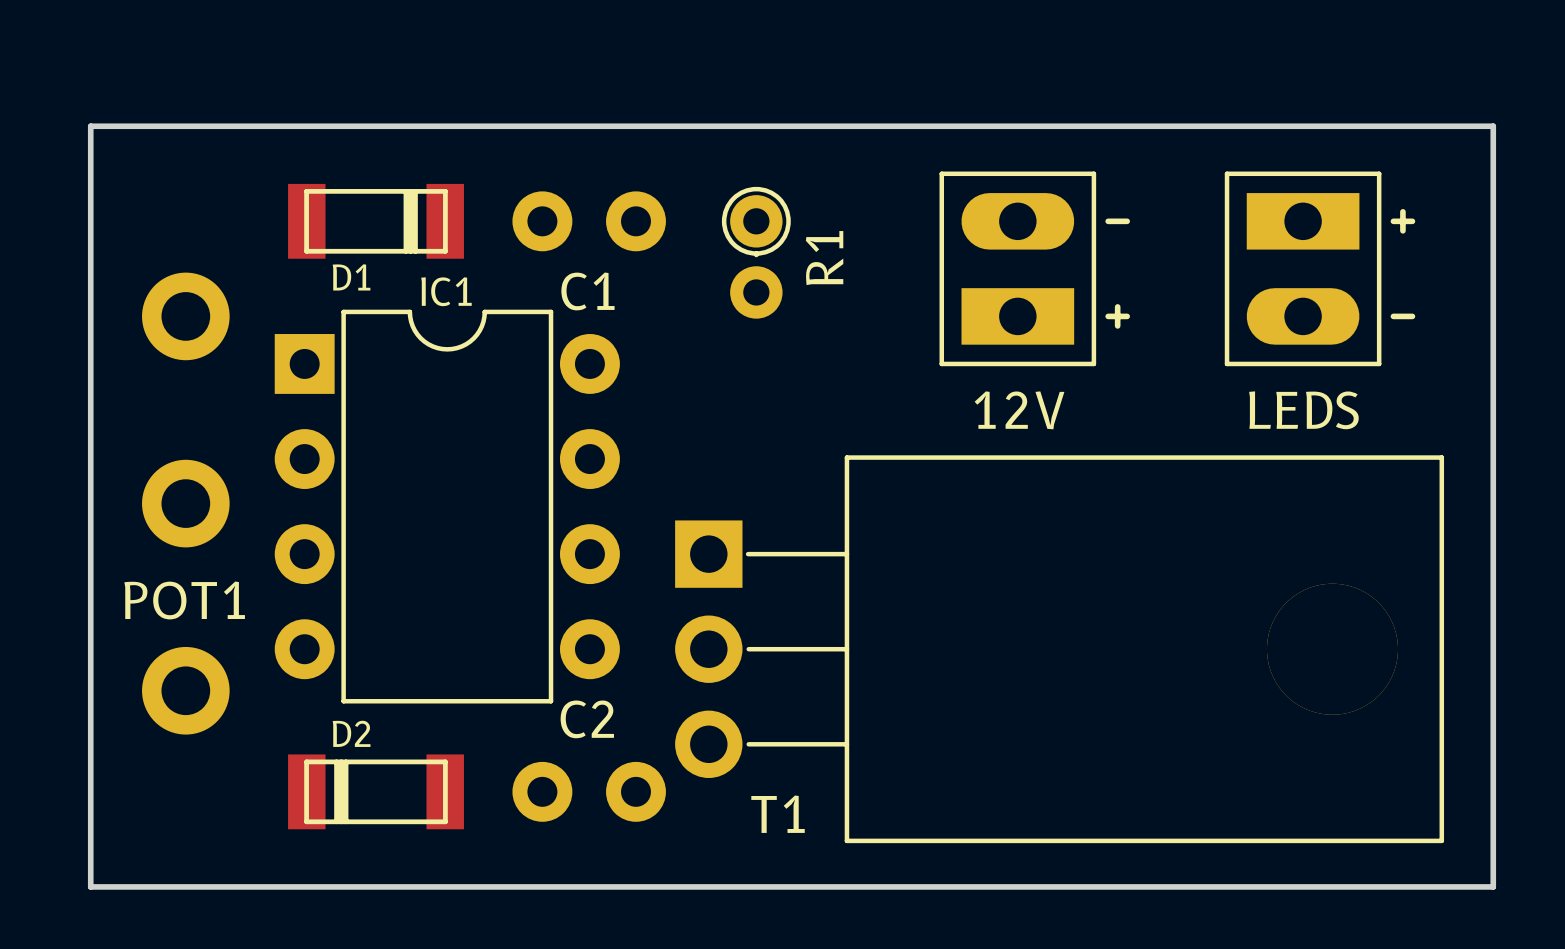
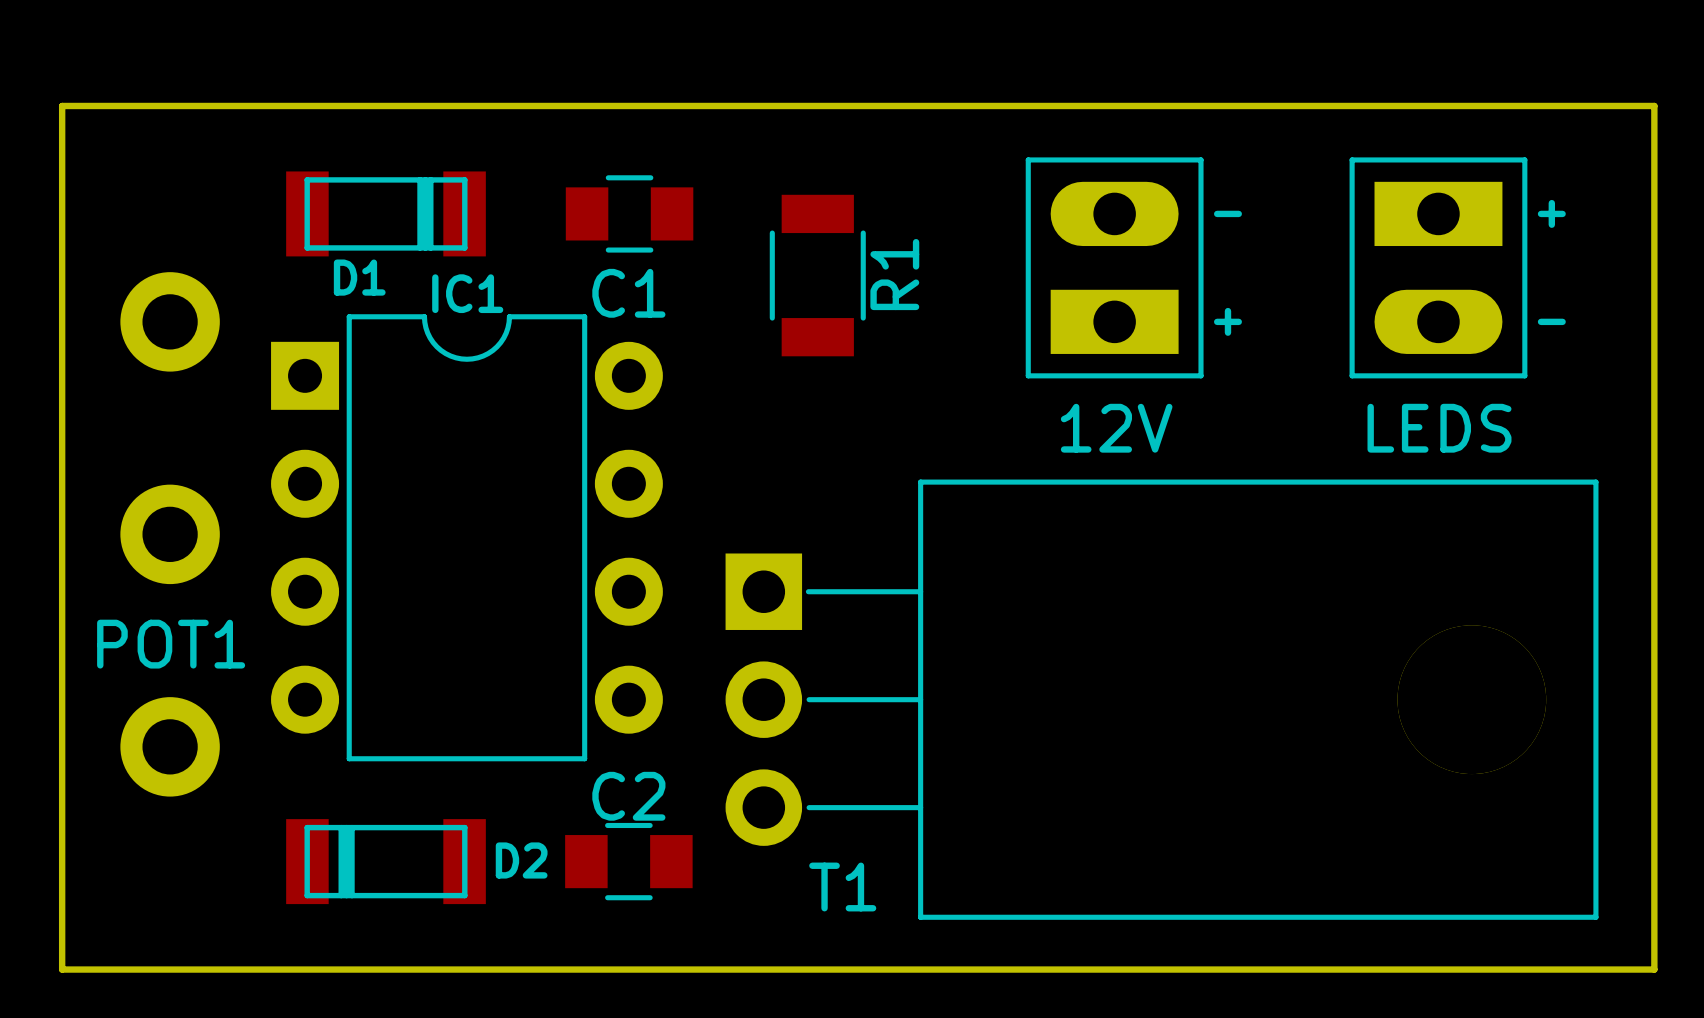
R1 footprint: [721, 186, 791, 319] -> [769, 194, 866, 357]
C1 footprint: [512, 191, 666, 252] -> [565, 175, 694, 253]
D2 name position: D2 (351, 733) -> D2 (521, 860)
C2 footprint: [512, 761, 666, 822] -> [565, 822, 693, 901]

